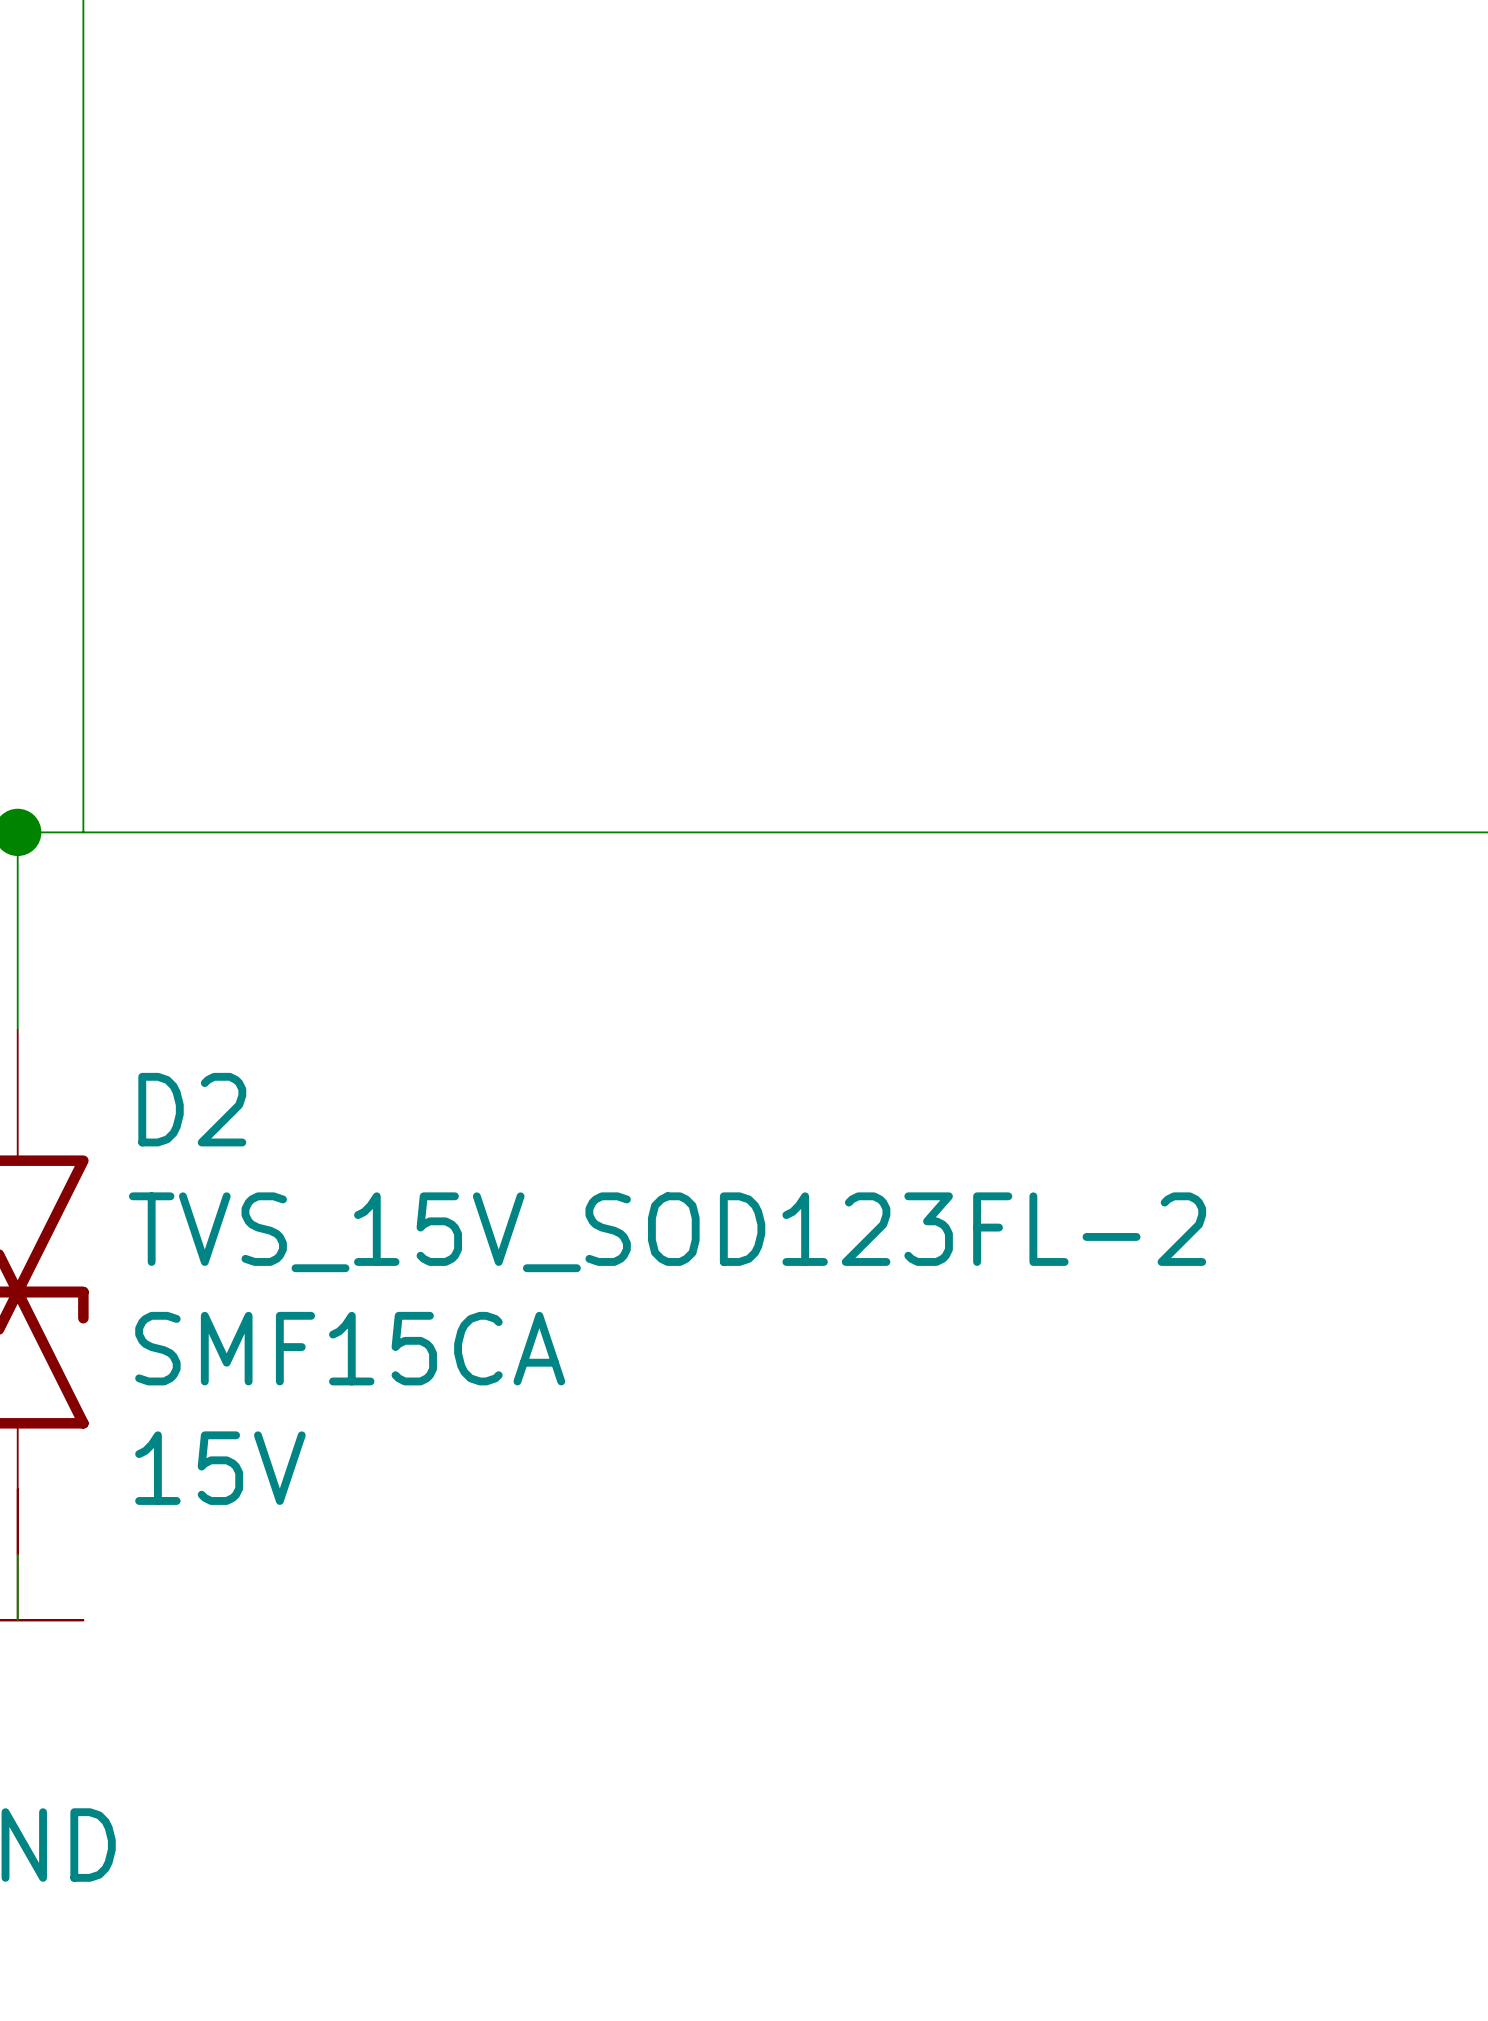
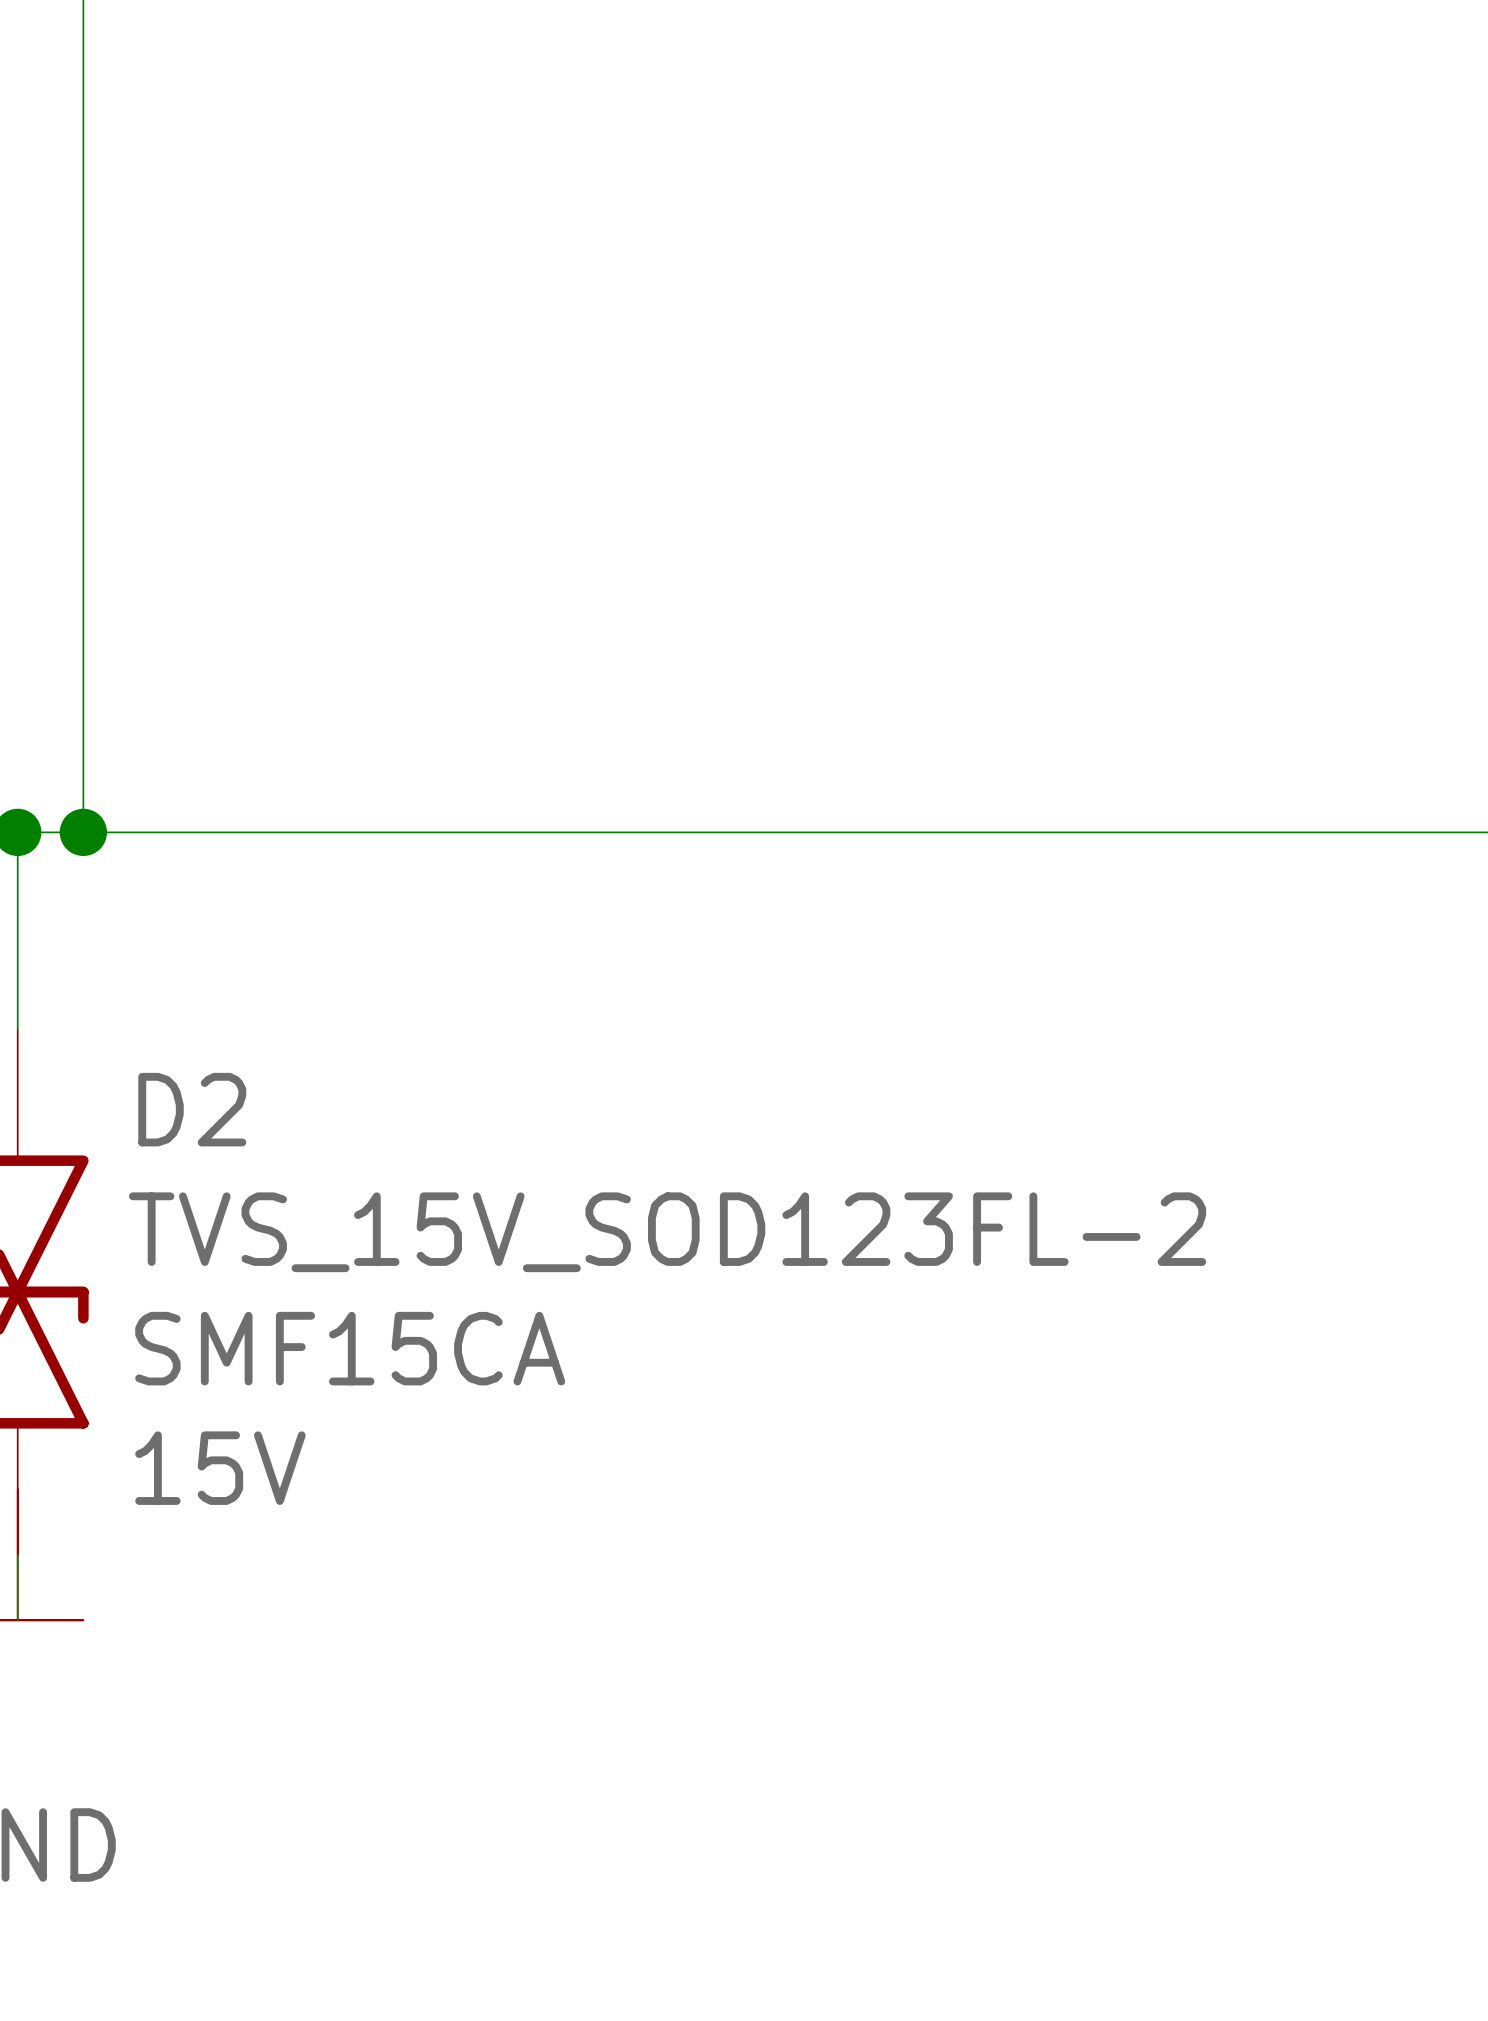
junction: none -> (83, 832)

